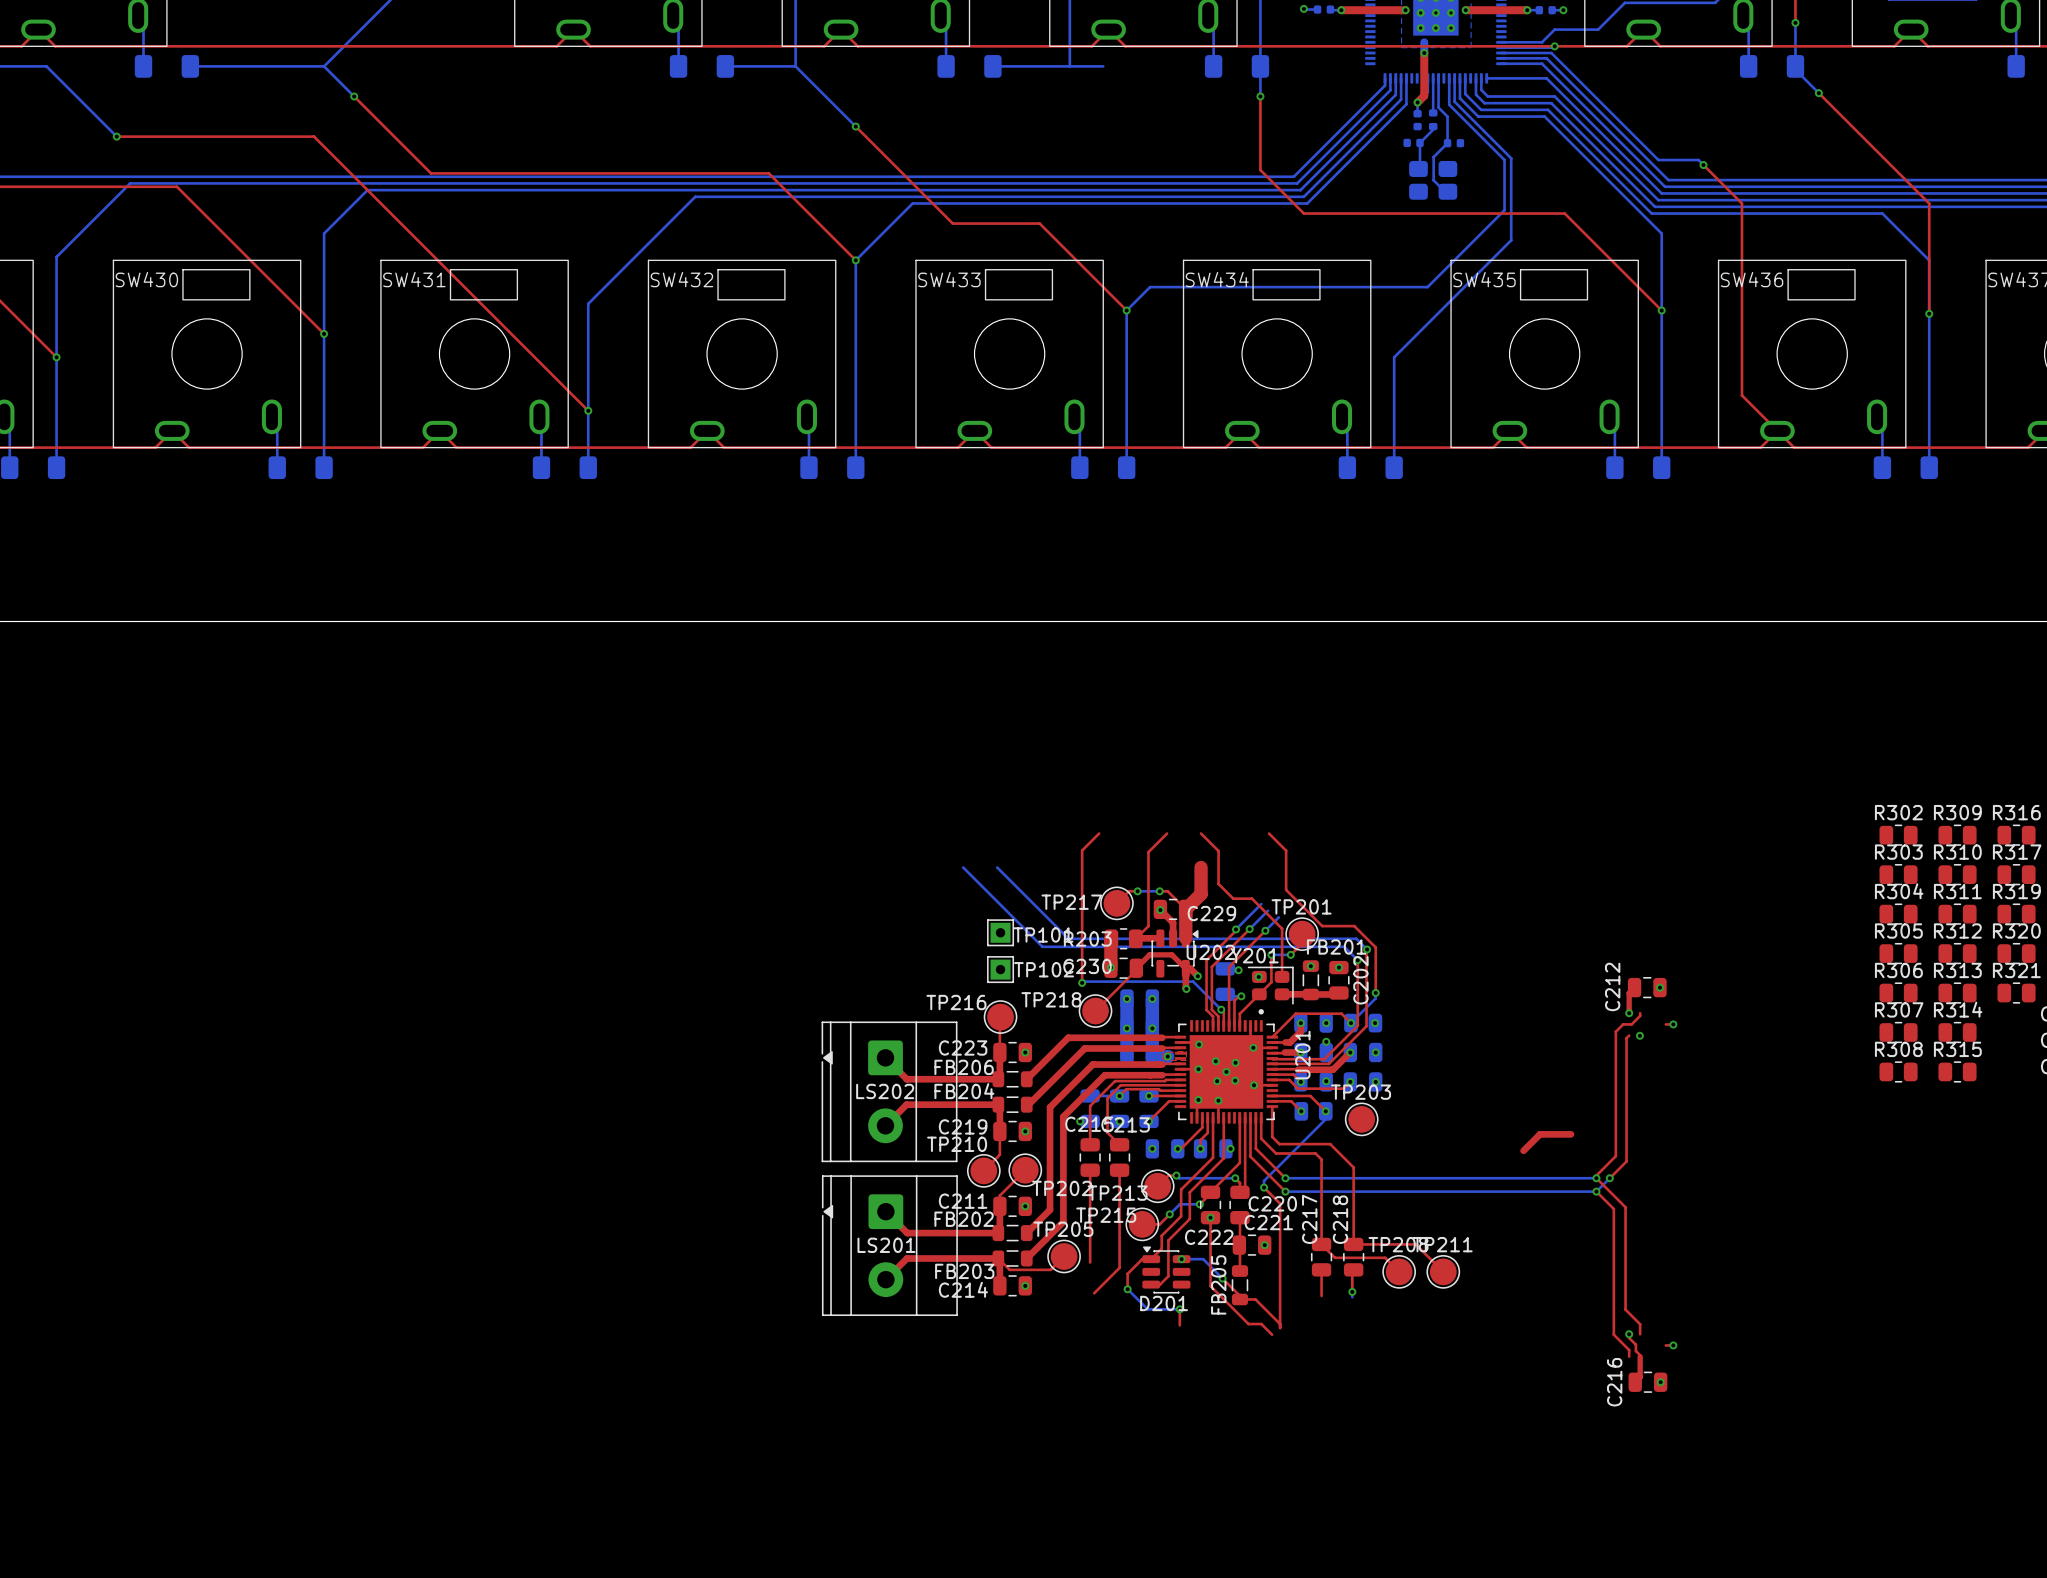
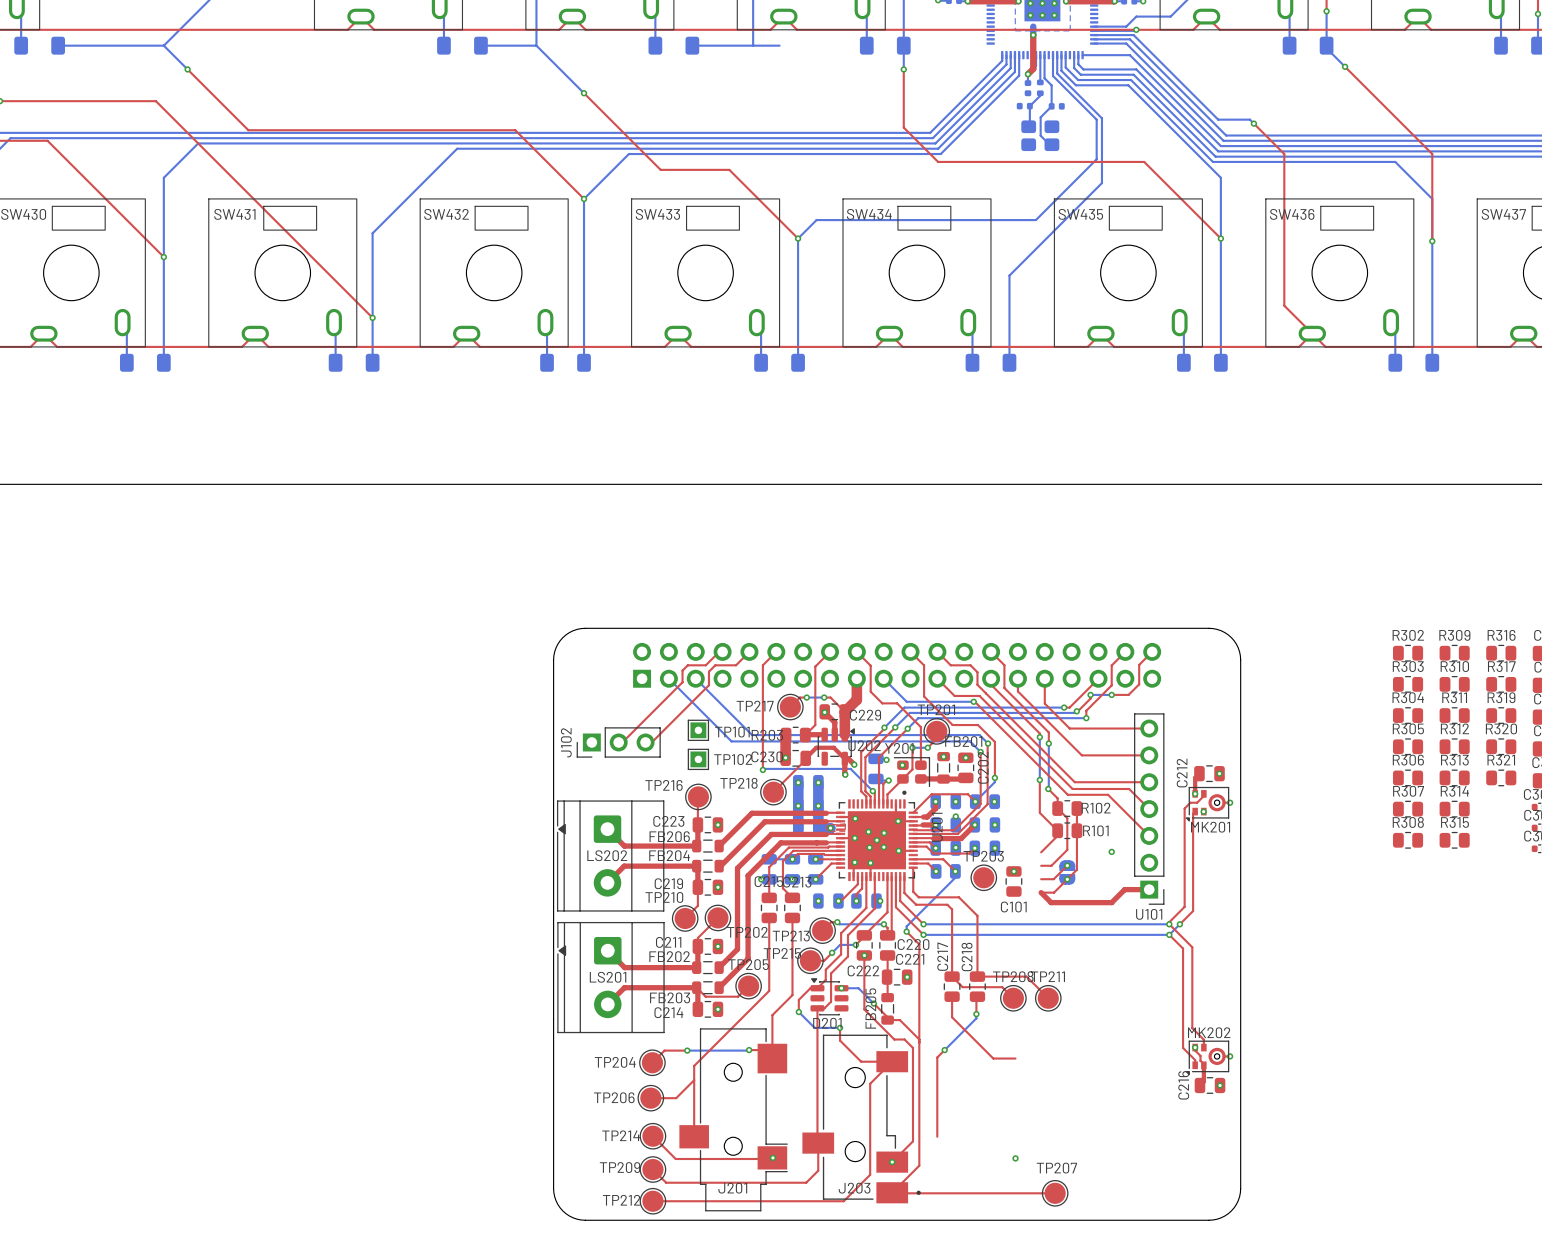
board edge: none -> (585, 628) (1208, 628) (1221, 630) (1231, 637) (1238, 647) (1240, 660) (1240, 1188) (1238, 1200) (1231, 1210) (1221, 1217) (1208, 1220) (585, 1220) (573, 1217) (562, 1210) (556, 1200) (553, 1188) (553, 660) (556, 647) (562, 637) (573, 630) (585, 628)
top track: none -> (722, 651) (719, 651) (705, 665) (687, 665) (682, 670) (682, 682) (622, 742) (618, 742)
top track: none -> (749, 651) (736, 665) (715, 665) (708, 671) (708, 685) (651, 742) (645, 742)
top track: none -> (937, 651) (950, 665) (970, 665) (977, 672) (977, 684) (1074, 782) (1149, 782)
top track: none -> (991, 651) (1004, 665) (1004, 688) (1048, 732) (1048, 743)
top track: none -> (1125, 651) (1111, 665) (1111, 685) (1086, 710) (1086, 718)
top track: none -> (1152, 651) (1139, 664) (1139, 684) (1128, 694) (1111, 694)
part: none -> (897, 665)
bottom track: none -> (883, 678) (906, 701) (973, 701)
top track: none -> (937, 678) (954, 695) (979, 695) (1072, 788) (1129, 788) (1149, 809)
top track: none -> (991, 678) (991, 684) (1039, 733) (1039, 737)
top track: none -> (1017, 678) (1017, 691) (1081, 755) (1149, 755)
top track: none -> (1044, 678) (1044, 703) (1069, 728) (1149, 728)
top track: none -> (1098, 678) (1069, 707) (1064, 707)
top track: none -> (1090, 694) (1090, 698) (1076, 711)
bottom track: none -> (1090, 694) (1111, 694)
via: none -> (1090, 694)
via: none -> (1111, 694)
top track: none -> (973, 701) (1067, 794) (1108, 794) (1149, 835)
via: none -> (973, 701)
bottom track: none -> (904, 707) (1064, 707)
via: none -> (1064, 707)
bottom track: none -> (1076, 711) (1076, 712) (909, 712)
via: none -> (1076, 711)
bottom track: none -> (918, 718) (1086, 718)
via: none -> (1086, 718)
bottom track: none -> (1039, 737) (1039, 780)
via: none -> (1039, 737)
J102: none -> (618, 742)
bottom track: none -> (1048, 743) (1048, 788)
via: none -> (1048, 743)
top track: none -> (1039, 780) (1039, 812) (1057, 830) (1057, 835) (1041, 852)
via: none -> (1039, 780)
top track: none -> (1048, 788) (1057, 798) (1057, 808) (1067, 818) (1067, 849) (1051, 865) (1041, 865)
via: none -> (1048, 788)
MK201: none -> (1207, 804)
R102: none -> (1067, 808)
top track: none -> (1076, 808) (1076, 869) (1054, 892) (1041, 892) (1051, 902) (1111, 902)
U101: none -> (1149, 809)
R101: none -> (1067, 830)
via: none -> (1111, 851)
top track: none -> (1067, 865) (1053, 879) (1041, 879)
via: none -> (1067, 865)
via: none -> (1013, 871)
part: none -> (1067, 872)
via: none -> (1067, 879)
C101: none -> (1013, 881)
top track: none -> (769, 990) (694, 1065) (694, 1136)
top track: none -> (817, 1008) (818, 1170) (806, 1182) (666, 1182) (652, 1169)
top track: none -> (772, 1015) (772, 1058) (763, 1050) (749, 1050)
top track: none -> (952, 1017) (993, 1058) (1015, 1058)
bottom track: none -> (976, 1018) (944, 1050)
top track: none -> (840, 1040) (861, 1061) (892, 1061) (870, 1083) (870, 1174) (843, 1201) (652, 1201)
top track: none -> (919, 1042) (919, 1165) (892, 1192) (1055, 1193)
top track: none -> (912, 1047) (912, 1141) (892, 1162)
bottom track: none -> (749, 1050) (687, 1050)
via: none -> (749, 1050)
top track: none -> (944, 1050) (937, 1057) (937, 1136)
via: none -> (944, 1050)
top track: none -> (687, 1050) (664, 1050) (652, 1062)
via: none -> (687, 1050)
MK202: none -> (1207, 1057)
TP204: none -> (652, 1062)
top track: none -> (694, 1080) (676, 1098) (650, 1098)
TP206: none -> (650, 1098)
J203: none -> (861, 1118)
J201: none -> (733, 1119)
top track: none -> (652, 1136) (675, 1158) (772, 1157)
TP214: none -> (652, 1136)
via: none -> (772, 1157)
via: none -> (1015, 1158)
via: none -> (892, 1162)
TP209: none -> (652, 1169)
TP207: none -> (1055, 1193)
TP212: none -> (652, 1201)

